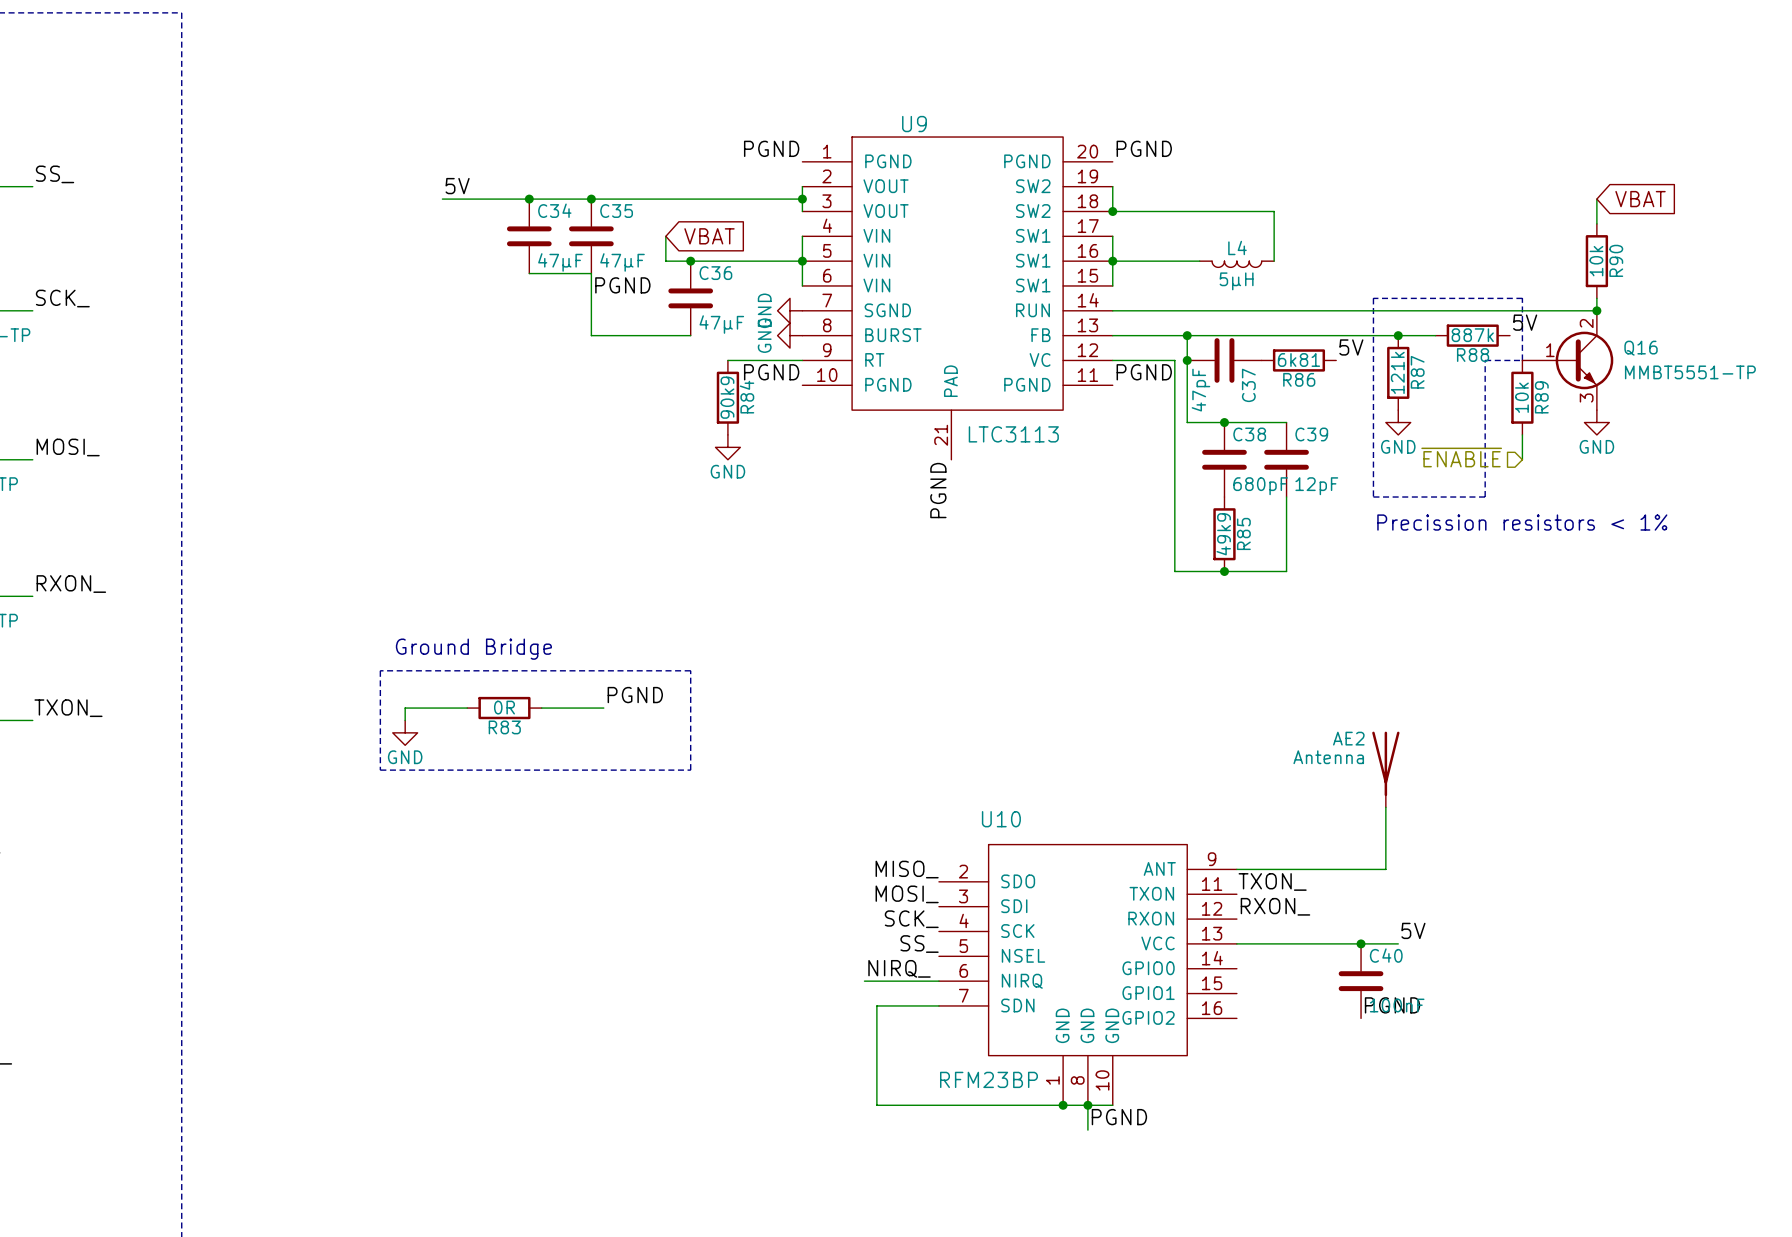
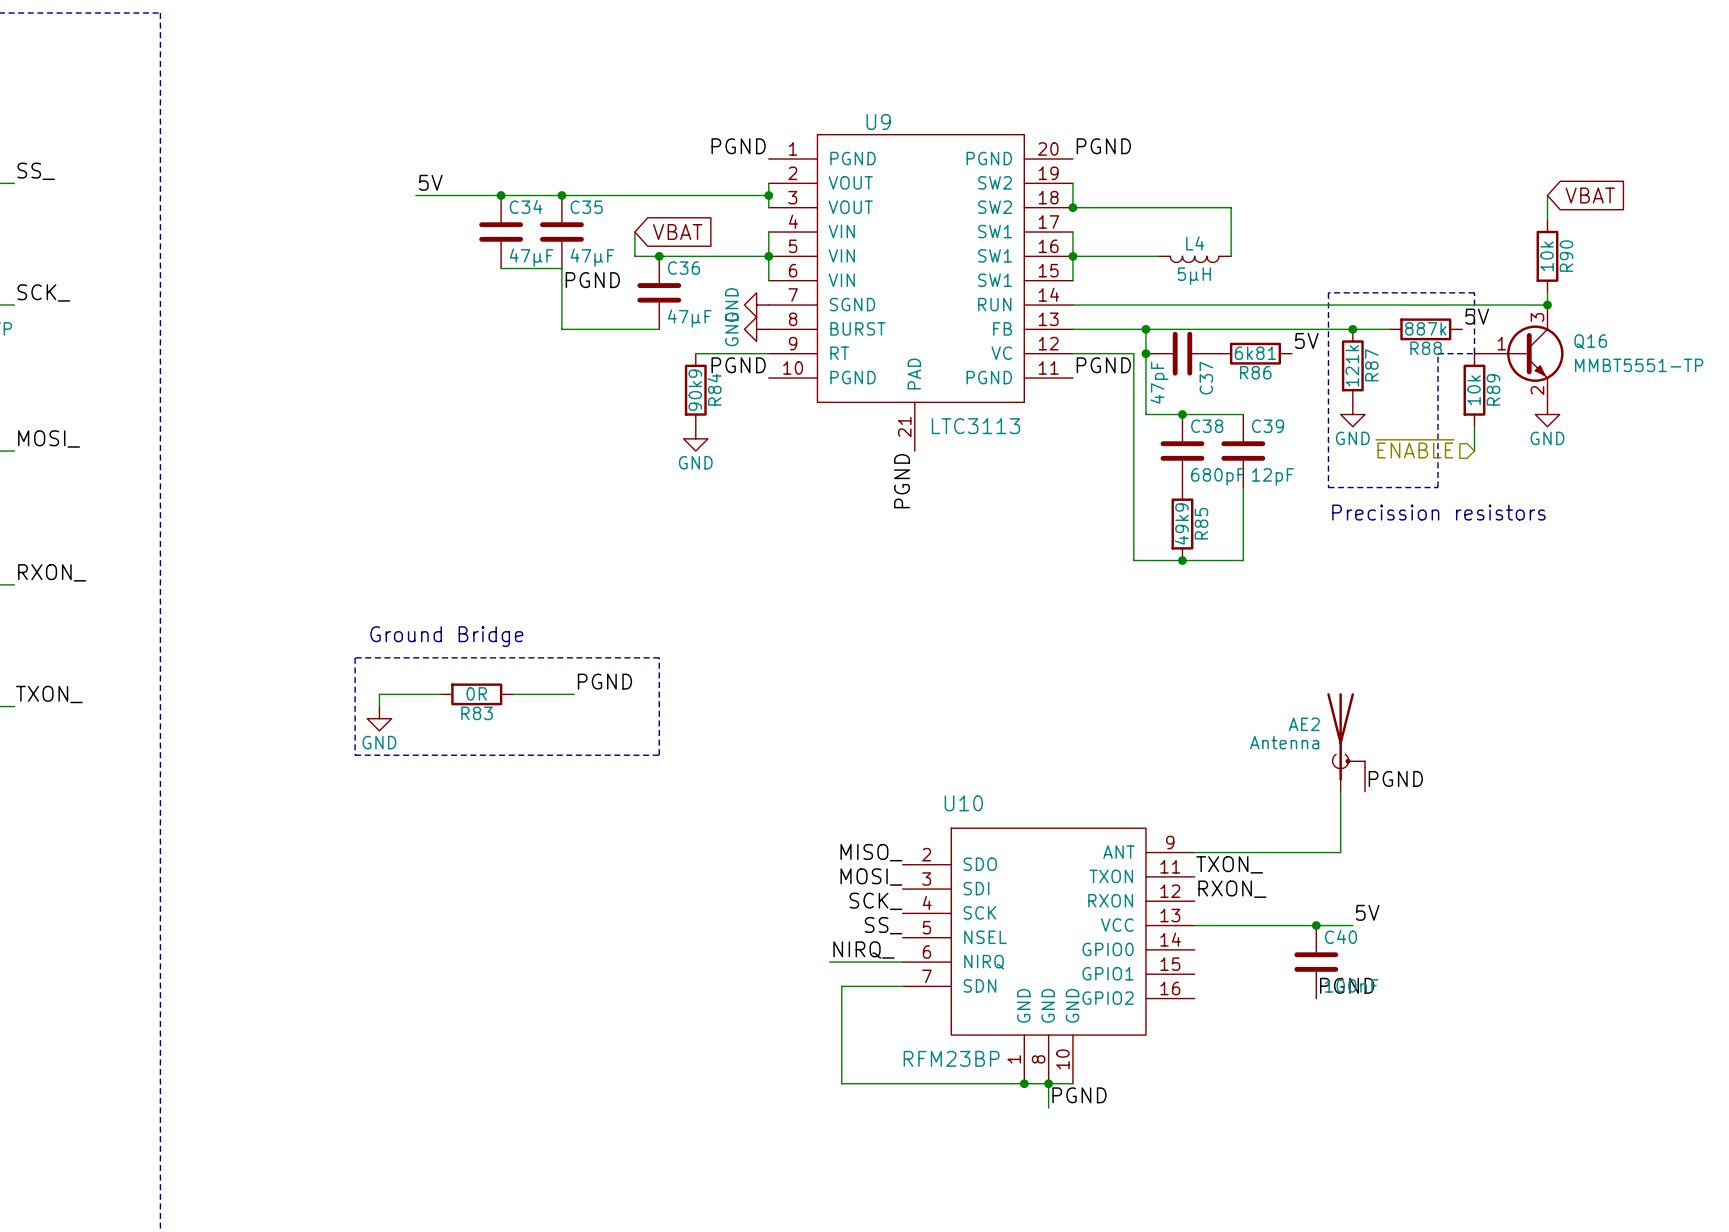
Q16 pin number: 2 (1586, 323) -> 3 (1537, 317)
Q16 pin number: 3 (1586, 398) -> 2 (1537, 390)
text: Precission resistors < 1% (1522, 522) -> Precission resistors (1438, 512)
AE2 symbol: [1372, 731, 1400, 808] -> [1327, 693, 1365, 792]
label: none -> PGND (1395, 778)

